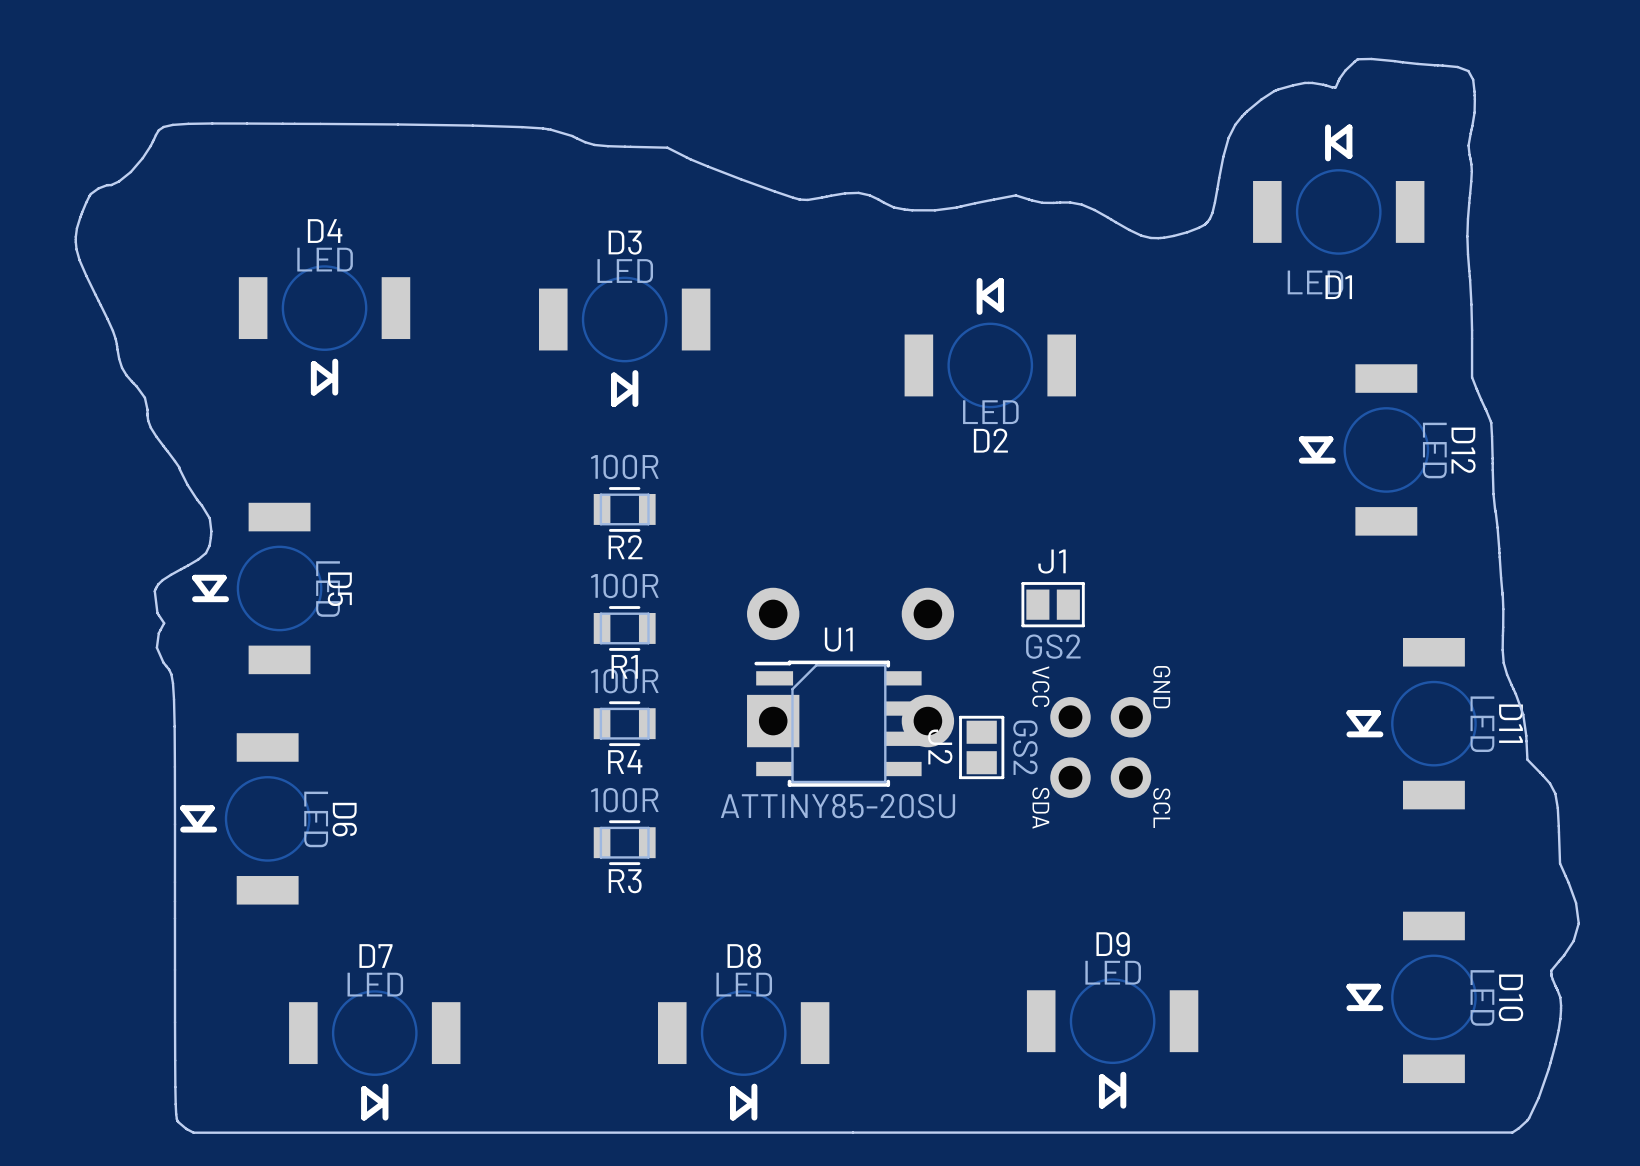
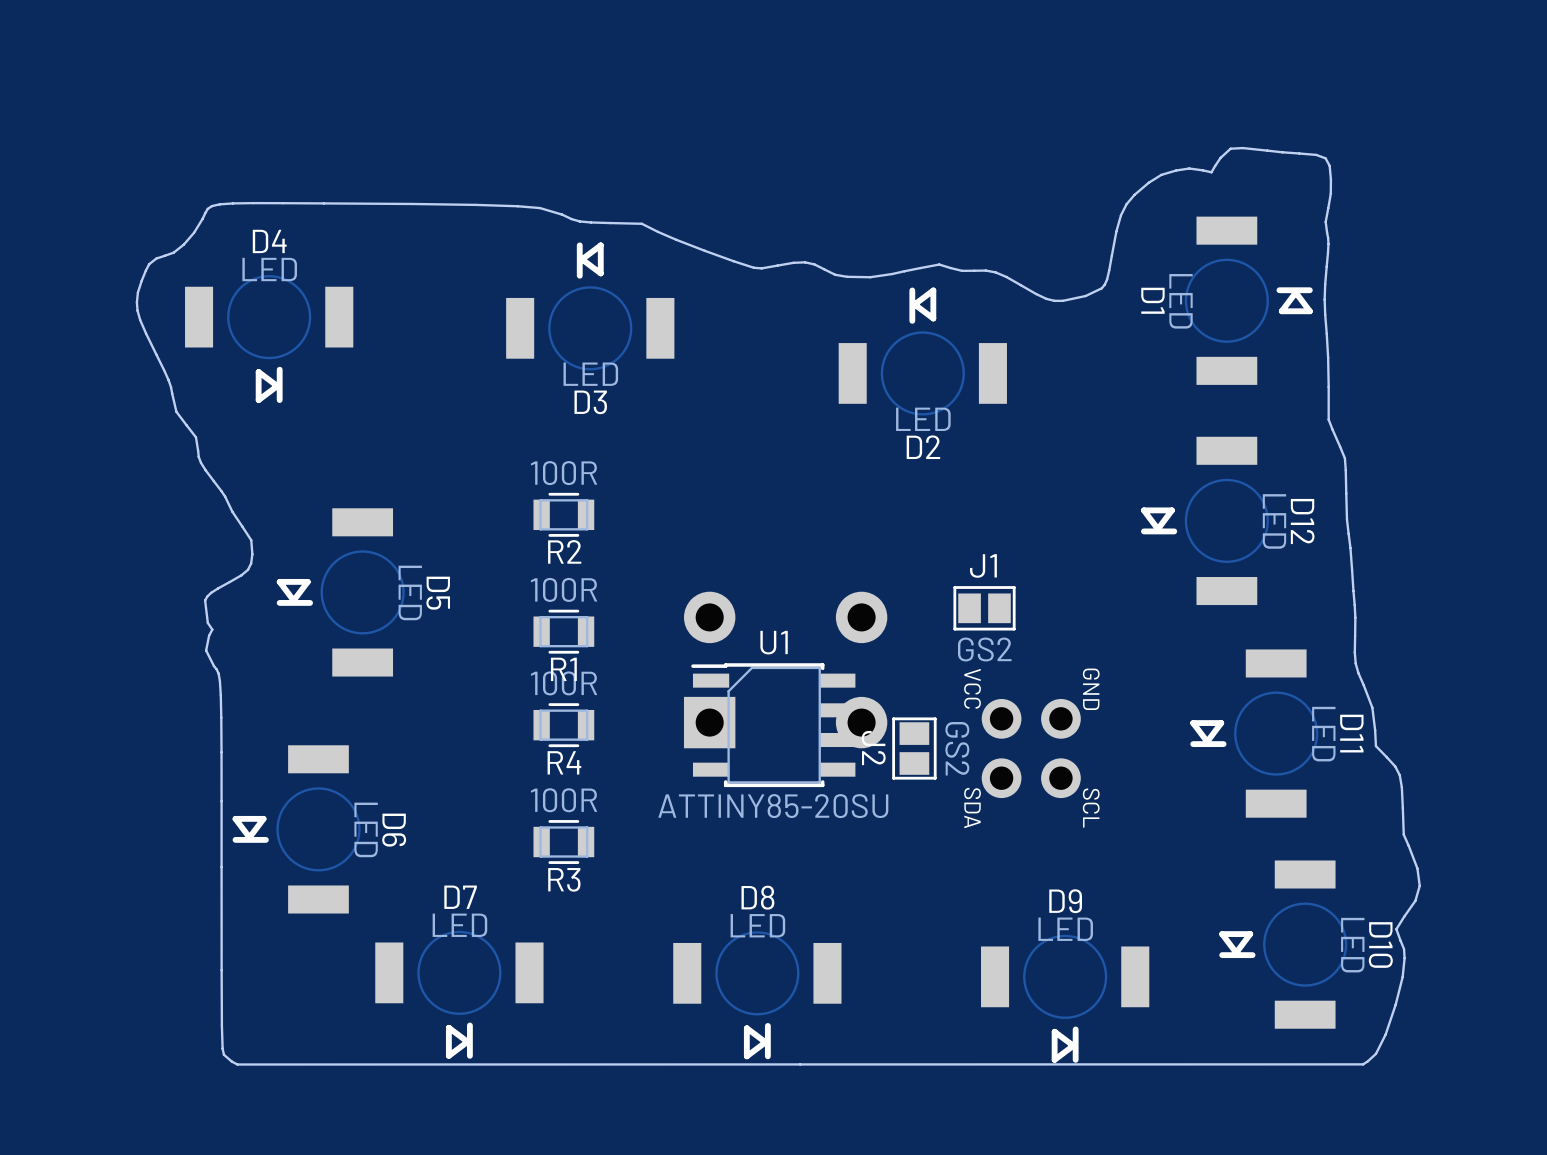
D1 rotation: 0° (1338, 189) -> 90° clockwise (1248, 300)
D1 position: (1338, 189) -> (1248, 300)
D3 rotation: 0° (624, 341) -> 180° (590, 306)
D12 position: (1364, 449) -> (1204, 520)
board edge: (179, 467) (150, 427) (144, 397) (122, 367) (112, 330) (79, 260) (75, 242) (80, 217) (90, 194) (98, 188) (118, 181) (130, 171) (142, 158) (158, 130) (163, 126) (188, 123) (247, 123) (472, 125) (542, 128) (572, 135) (594, 144) (667, 147) (708, 166) (800, 199) (858, 192) (869, 195) (893, 207) (912, 210) (935, 210) (1015, 195) (1042, 202) (1070, 202) (1081, 204) (1141, 235) (1158, 238) (1187, 232) (1207, 222) (1212, 212) (1228, 137) (1235, 124) (1246, 111) (1274, 91) (1304, 82) (1335, 87) (1345, 70) (1357, 59) (1457, 67) (1468, 71) (1473, 79) (1474, 99) (1474, 112) (1468, 145) (1471, 171) (1467, 236) (1471, 304) (1472, 377) (1491, 423) (1493, 494) (1502, 595) (1503, 662) (1523, 714) (1527, 759) (1550, 783) (1555, 793) (1560, 863) (1576, 903) (1578, 923) (1573, 941) (1551, 970) (1551, 975) (1560, 997) (1560, 1018) (1551, 1058) (1538, 1097) (1527, 1120) (1512, 1132) (193, 1132) (178, 1121) (176, 1114) (174, 699) (171, 674) (156, 647) (158, 633) (164, 623) (157, 613) (154, 591) (162, 580) (205, 553) (209, 545) (211, 531) (209, 518) (187, 484) (179, 467) -> (1242, 148) (1316, 154) (1325, 158) (1329, 165) (1330, 193) (1325, 222) (1328, 244) (1324, 299) (1328, 357) (1328, 419) (1344, 458) (1346, 519) (1354, 604) (1355, 663) (1372, 707) (1375, 746) (1395, 766) (1399, 775) (1403, 834) (1417, 868) (1419, 885) (1415, 900) (1396, 929) (1404, 949) (1404, 958) (1402, 977) (1395, 1004) (1385, 1034) (1375, 1053) (1367, 1061) (1363, 1064) (237, 1064) (223, 1054) (221, 1025) (220, 694) (218, 673) (206, 650) (212, 629) (207, 622) (205, 600) (211, 592) (248, 569) (252, 554) (251, 540) (232, 511) (225, 496) (200, 462) (195, 437) (176, 411) (168, 380) (140, 319) (136, 302) (137, 292) (149, 264) (156, 258) (173, 252) (183, 244) (194, 232) (207, 208) (219, 204) (253, 203) (475, 204) (539, 208) (579, 221) (641, 223) (676, 239) (753, 267) (805, 262) (814, 264) (835, 274) (870, 277) (939, 264) (962, 270) (995, 272) (1046, 298) (1062, 300) (1085, 296) (1101, 288) (1104, 284) (1120, 215) (1134, 194) (1148, 182) (1161, 174) (1176, 170) (1189, 168) (1211, 172) (1220, 157) (1230, 148) (1242, 148)
D5 position: (257, 588) -> (340, 592)
D5 name position: D5 (339, 589) -> D5 (438, 593)
D11 position: (1411, 723) -> (1254, 733)
D6 position: (245, 818) -> (296, 829)
D10 position: (1411, 997) -> (1283, 944)
D9 position: (1112, 1043) -> (1065, 998)
D7 position: (374, 1055) -> (459, 994)
D8 position: (743, 1055) -> (757, 995)

